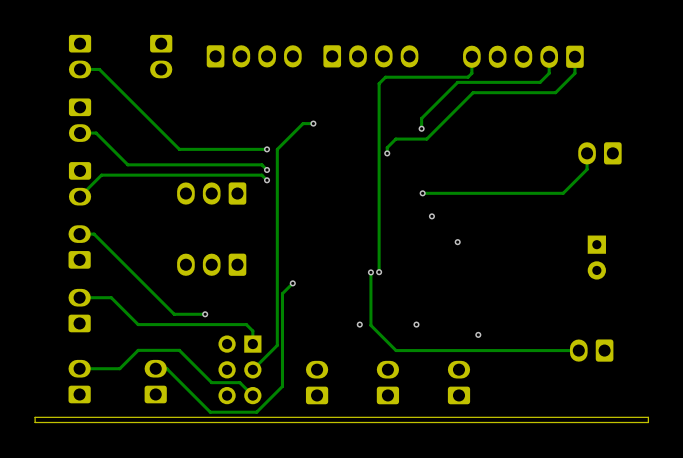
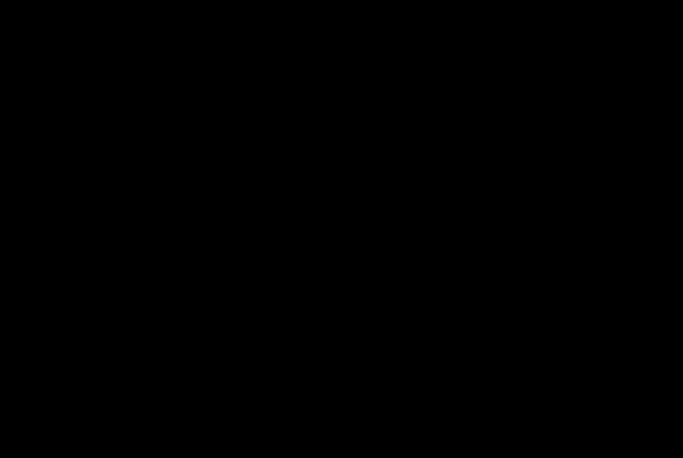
part: (80, 56) -> none
part: (161, 56) -> none
part: (254, 56) -> none
part: (370, 56) -> none
track: (471, 56) (471, 73) (468, 77) (385, 77) (379, 83) (379, 272) -> none
part: (523, 56) -> none
track: (549, 56) (549, 73) (540, 82) (457, 82) (421, 118) (421, 128) -> none
track: (574, 56) (574, 73) (555, 92) (473, 92) (426, 139) (395, 139) (387, 147) (387, 153) -> none
track: (80, 69) (99, 69) (179, 149) (267, 149) -> none
part: (80, 120) -> none
track: (313, 123) (303, 123) (277, 149) (277, 345) (252, 369) -> none
via: (313, 123) -> none
via: (421, 128) -> none
track: (80, 133) (96, 133) (127, 164) (261, 164) (267, 169) -> none
via: (267, 149) -> none
via: (387, 153) -> none
track: (587, 153) (587, 169) (563, 193) (422, 193) -> none
part: (599, 153) -> none
via: (267, 169) -> none
track: (267, 180) (261, 175) (101, 175) (80, 196) -> none
via: (267, 180) -> none
part: (80, 183) -> none
part: (211, 193) -> none
via: (422, 193) -> none
via: (431, 216) -> none
track: (79, 234) (94, 234) (174, 314) (205, 314) -> none
via: (457, 242) -> none
part: (79, 246) -> none
part: (596, 257) -> none
part: (211, 264) -> none
track: (370, 272) (370, 325) (396, 350) (578, 350) -> none
via: (370, 272) -> none
via: (379, 272) -> none
track: (292, 283) (282, 293) (282, 386) (256, 412) (210, 412) (166, 368) (155, 368) -> none
via: (292, 283) -> none
track: (79, 297) (111, 297) (138, 324) (246, 324) (252, 331) (252, 344) -> none
part: (79, 310) -> none
via: (205, 314) -> none
via: (359, 324) -> none
via: (416, 324) -> none
via: (478, 334) -> none
part: (591, 350) -> none
track: (79, 368) (119, 368) (138, 350) (179, 350) (211, 382) (239, 382) (252, 395) -> none
part: (239, 369) -> none
part: (79, 381) -> none
part: (155, 381) -> none
part: (317, 382) -> none
part: (387, 382) -> none
part: (458, 382) -> none
board edge: (648, 417) (35, 417) (35, 422) (648, 422) (648, 417) -> none

